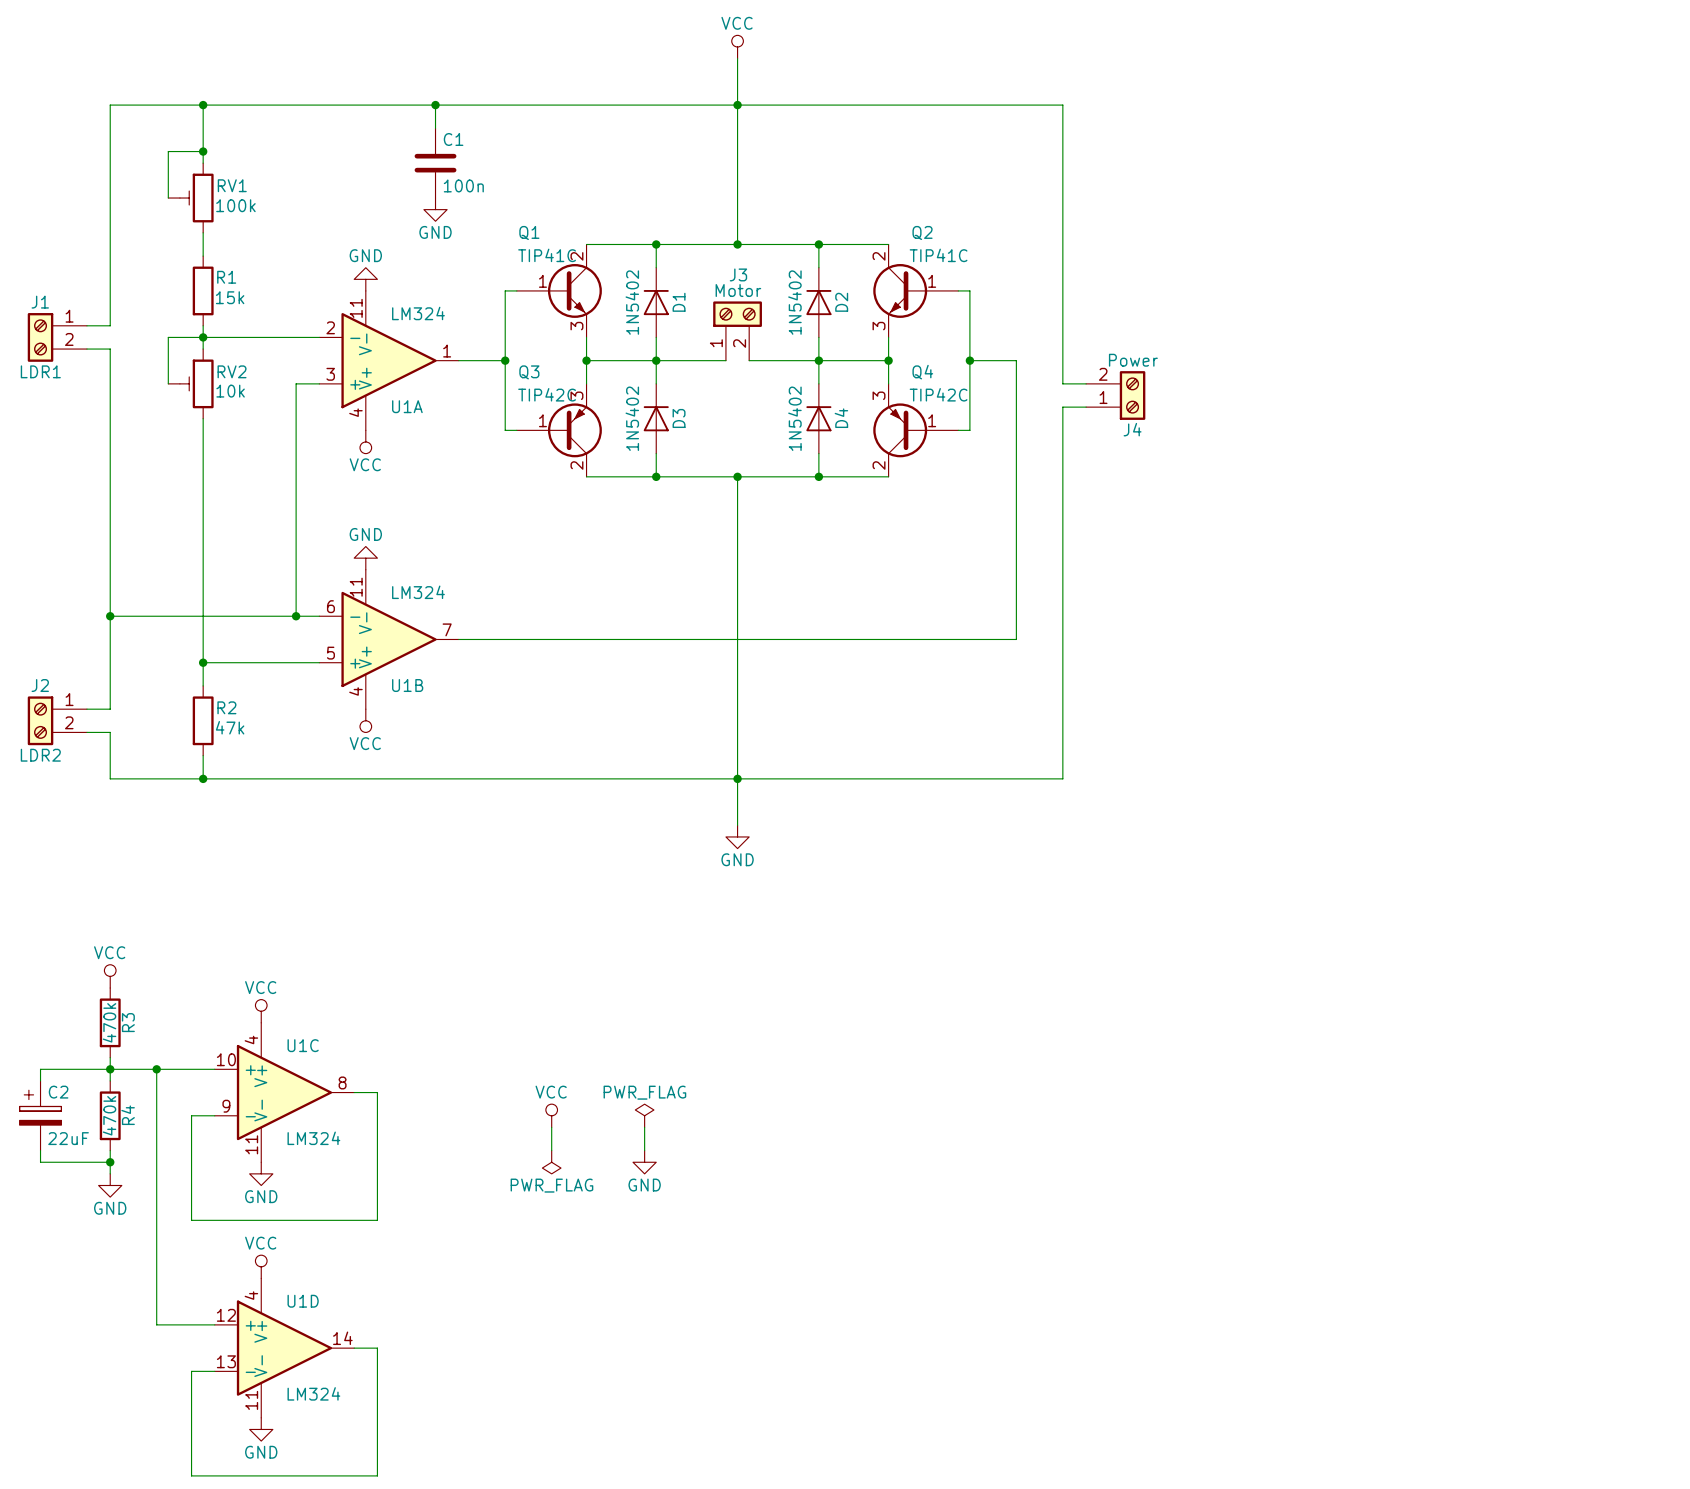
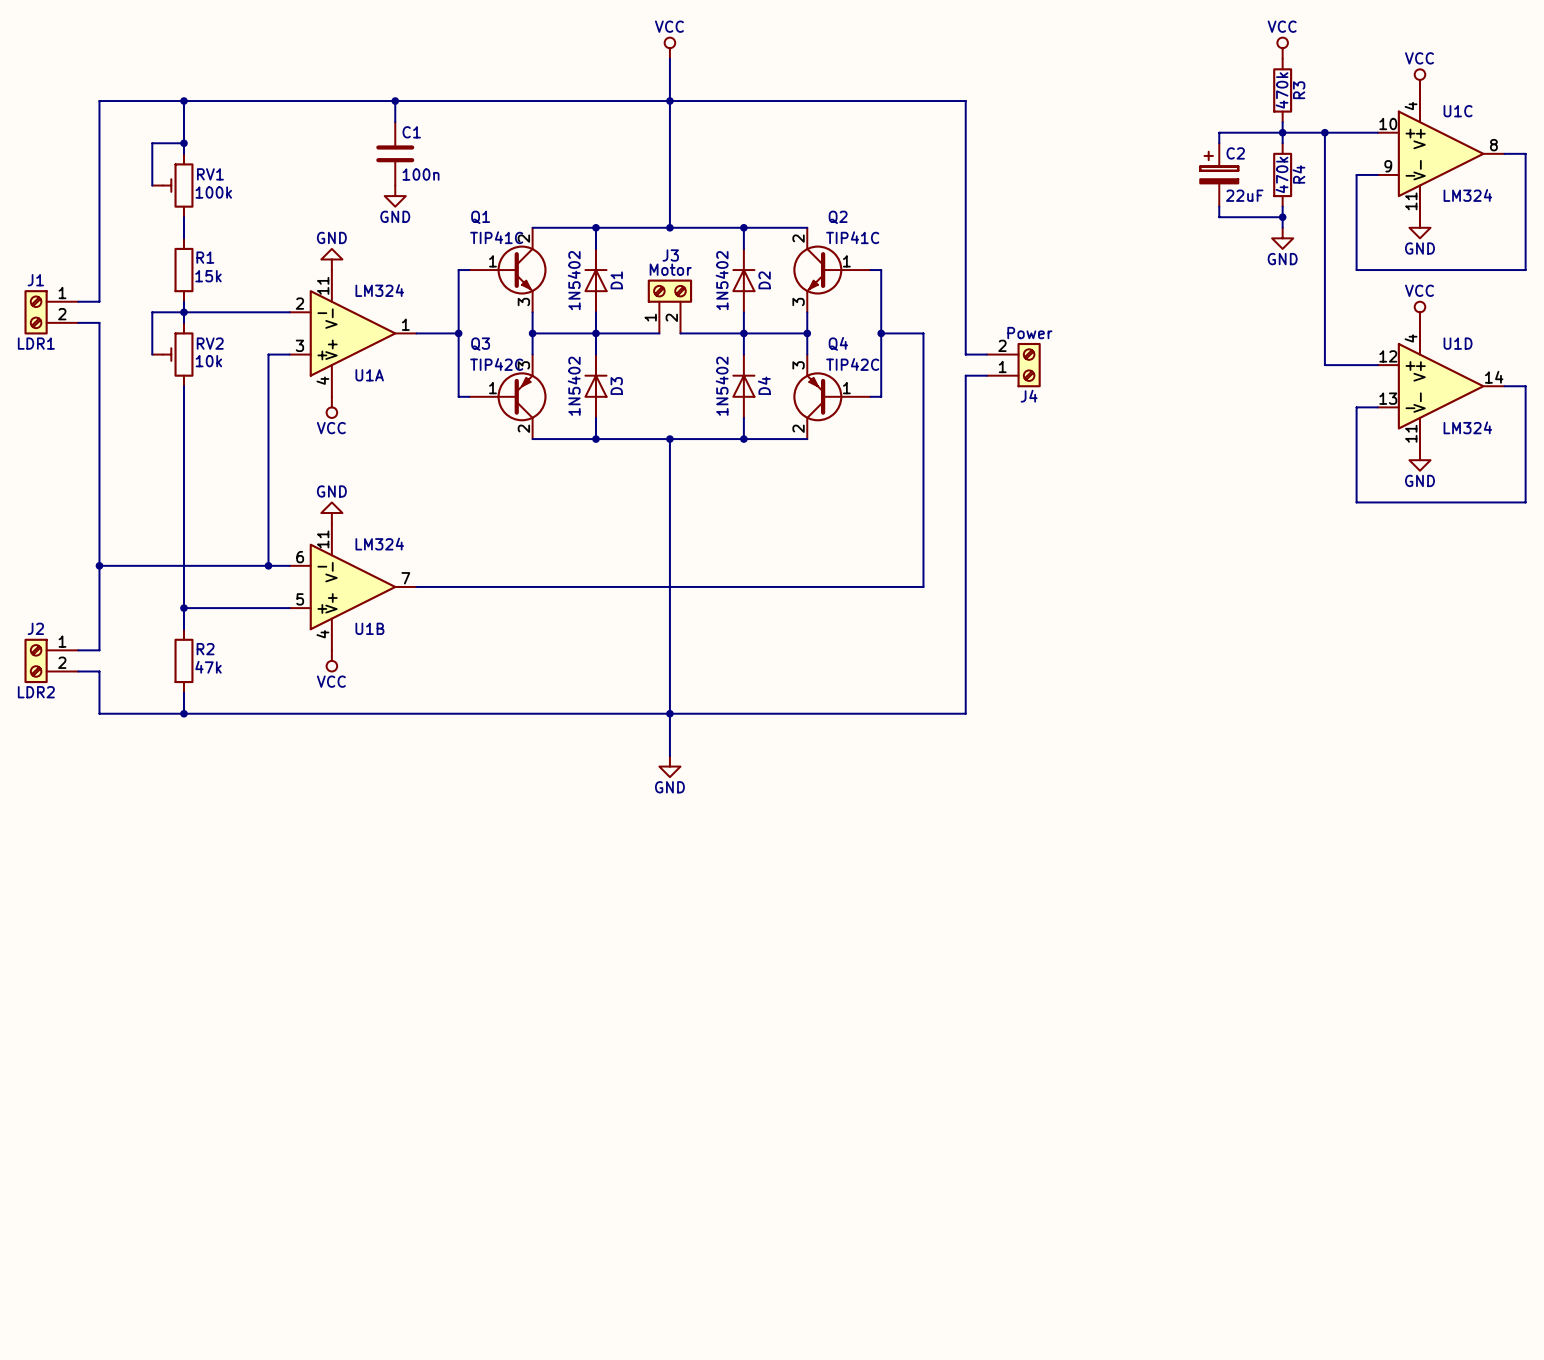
power symbol: none -> VCC (1282, 48)
power symbol: none -> VCC (1419, 79)
wire: none -> (1282, 122) (1282, 143)
junction: none -> (1282, 132)
wire: none -> (1324, 132) (1324, 365) (1377, 365)
junction: none -> (1324, 132)
wire: none -> (1377, 132) (1219, 132) (1219, 143)
wire: none -> (1504, 153) (1525, 153) (1525, 270) (1356, 270) (1356, 174) (1377, 174)
wire: none -> (1219, 206) (1219, 217) (1282, 217)
wire: none -> (1282, 206) (1282, 227)
junction: none -> (1282, 217)
power symbol: none -> GND (1419, 227)
power symbol: none -> GND (1282, 238)
power symbol: none -> VCC (1419, 312)
wire: none -> (1504, 386) (1525, 386) (1525, 502) (1356, 502) (1356, 407) (1377, 407)
power symbol: none -> GND (1419, 460)
power symbol: VCC (110, 976) -> none
power symbol: VCC (261, 1011) -> none
R3 position: (110, 1022) -> (1282, 90)
wire: (110, 1057) (110, 1080) -> none
junction: (110, 1069) -> none
wire: (156, 1069) (156, 1324) (214, 1324) -> none
junction: (156, 1069) -> none
wire: (214, 1069) (40, 1069) (40, 1080) -> none
U1C position: (284, 1092) -> (1441, 153)
wire: (354, 1092) (377, 1092) (377, 1220) (191, 1220) (191, 1115) (214, 1115) -> none
C2 position: (40, 1115) -> (1219, 174)
R4 position: (110, 1115) -> (1282, 174)
power symbol: VCC (551, 1115) -> none
power symbol: PWR_FLAG (644, 1115) -> none
wire: (551, 1127) (551, 1150) -> none
wire: (644, 1127) (644, 1150) -> none
wire: (40, 1150) (40, 1162) (110, 1162) -> none
wire: (110, 1150) (110, 1173) -> none
junction: (110, 1162) -> none
power symbol: PWR_FLAG (551, 1162) -> none
power symbol: GND (644, 1162) -> none
power symbol: GND (261, 1173) -> none
power symbol: GND (110, 1185) -> none
power symbol: VCC (261, 1266) -> none
U1D position: (284, 1348) -> (1441, 386)
wire: (354, 1348) (377, 1348) (377, 1475) (191, 1475) (191, 1371) (214, 1371) -> none
power symbol: GND (261, 1429) -> none

